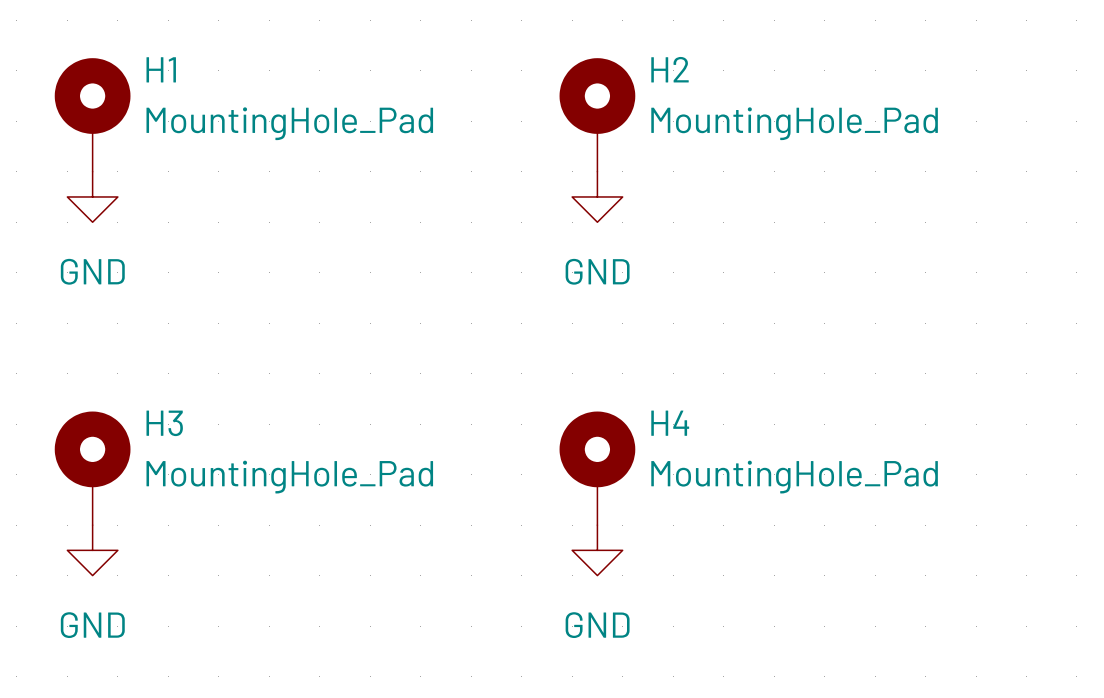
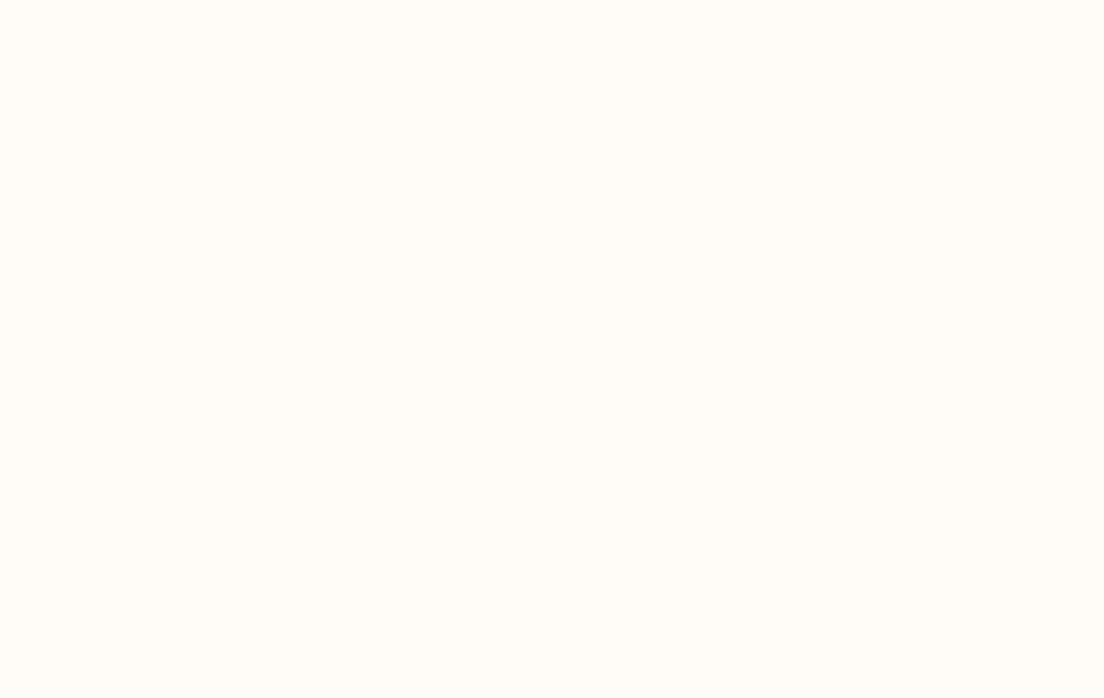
H1: MountingHole_Pad (92, 114) -> none
H2: MountingHole_Pad (597, 114) -> none
power symbol: GND (92, 196) -> none
power symbol: GND (597, 196) -> none
H3: MountingHole_Pad (92, 468) -> none
H4: MountingHole_Pad (597, 468) -> none
power symbol: GND (92, 550) -> none
power symbol: GND (597, 550) -> none

